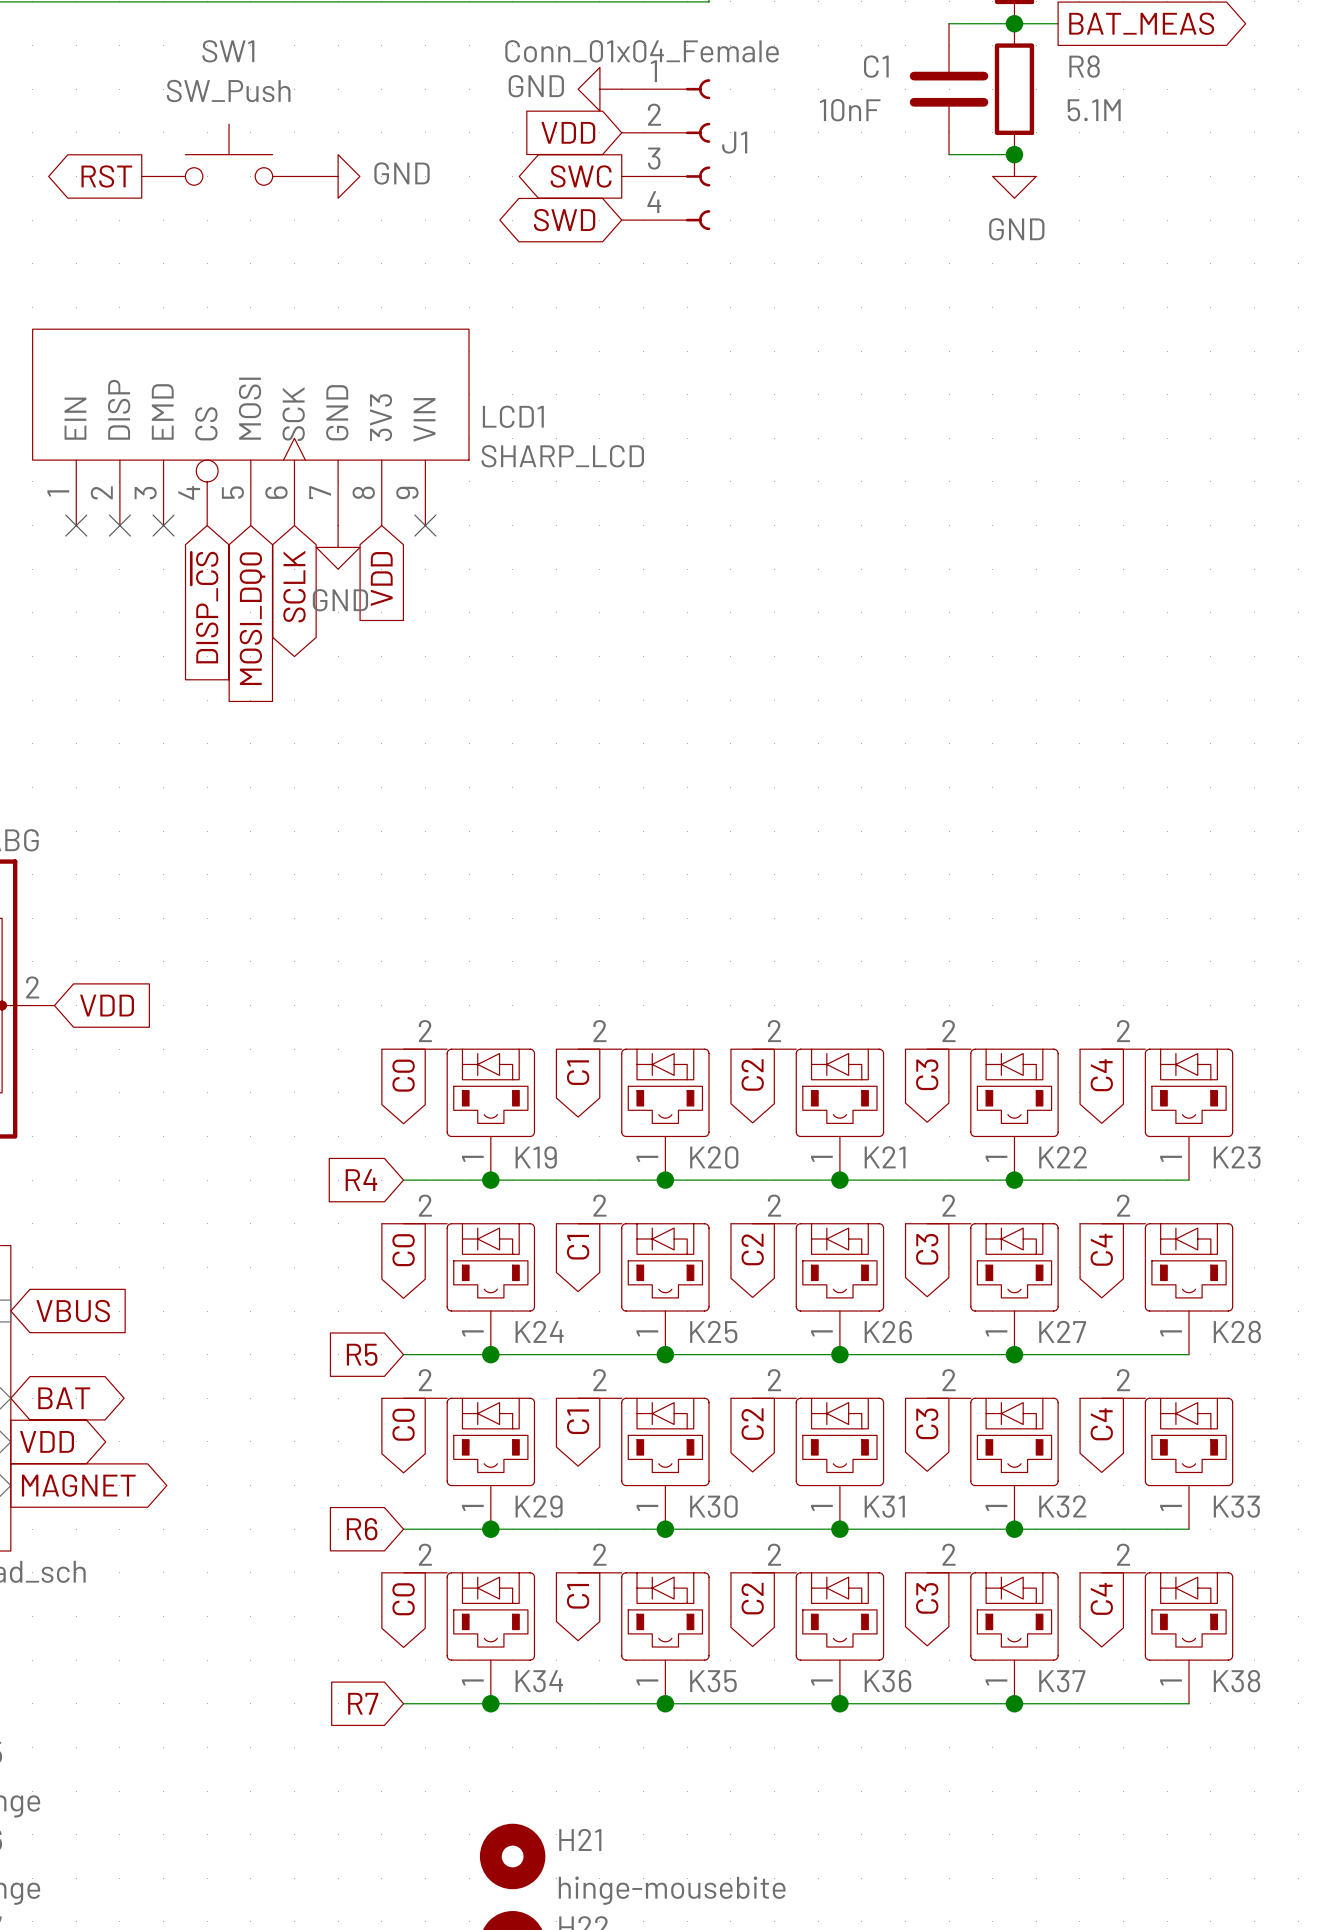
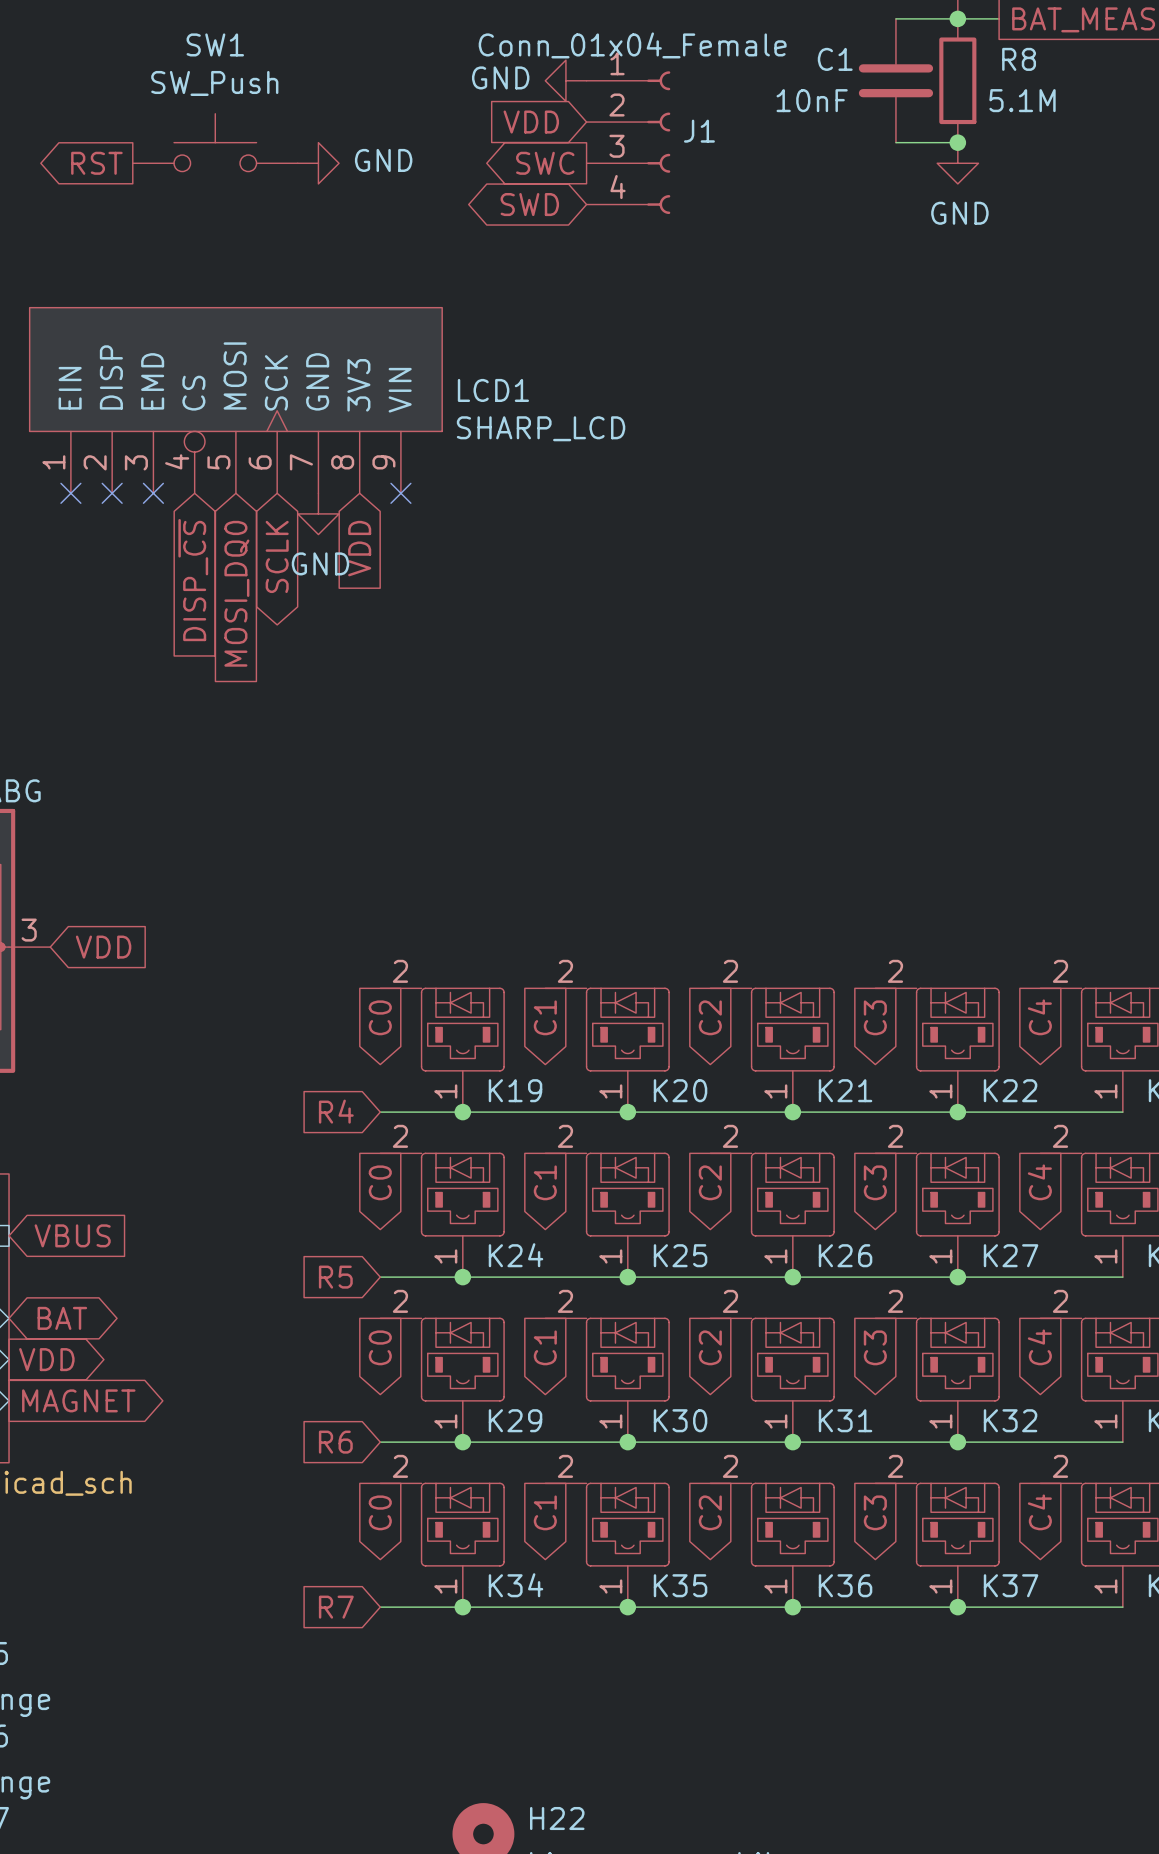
part pin number: 2 (32, 987) -> 3 (29, 930)
H21: hinge-mousebite (512, 1856) -> none

